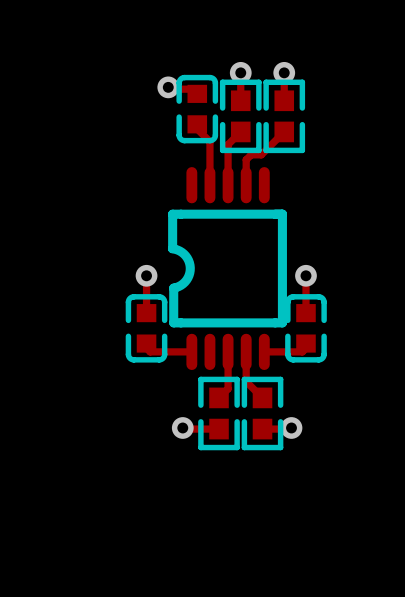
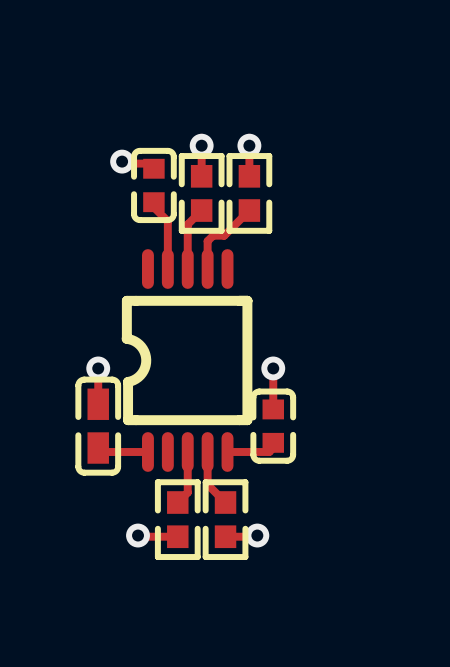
part footprint: [125, 294, 168, 363] -> [75, 376, 122, 476]

